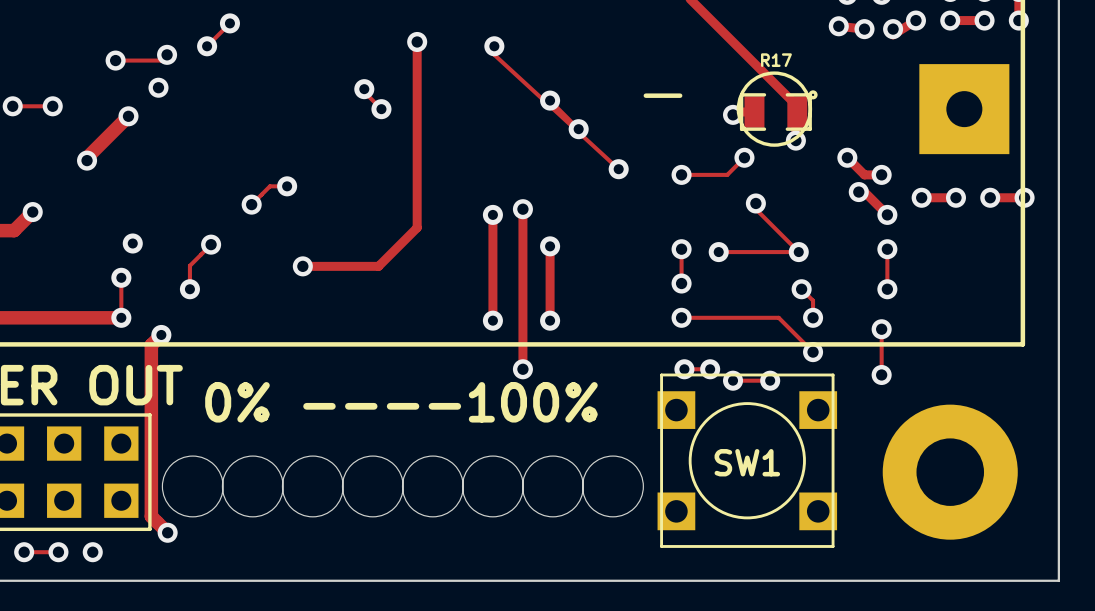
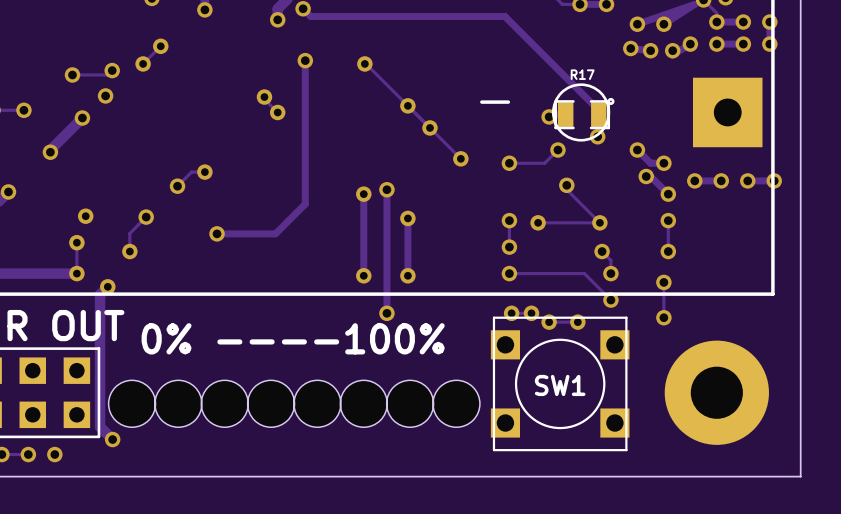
track: none -> (364, 59) (364, 62) (407, 105)
track: (494, 46) (494, 54) (618, 169) -> (429, 127) (460, 158)

